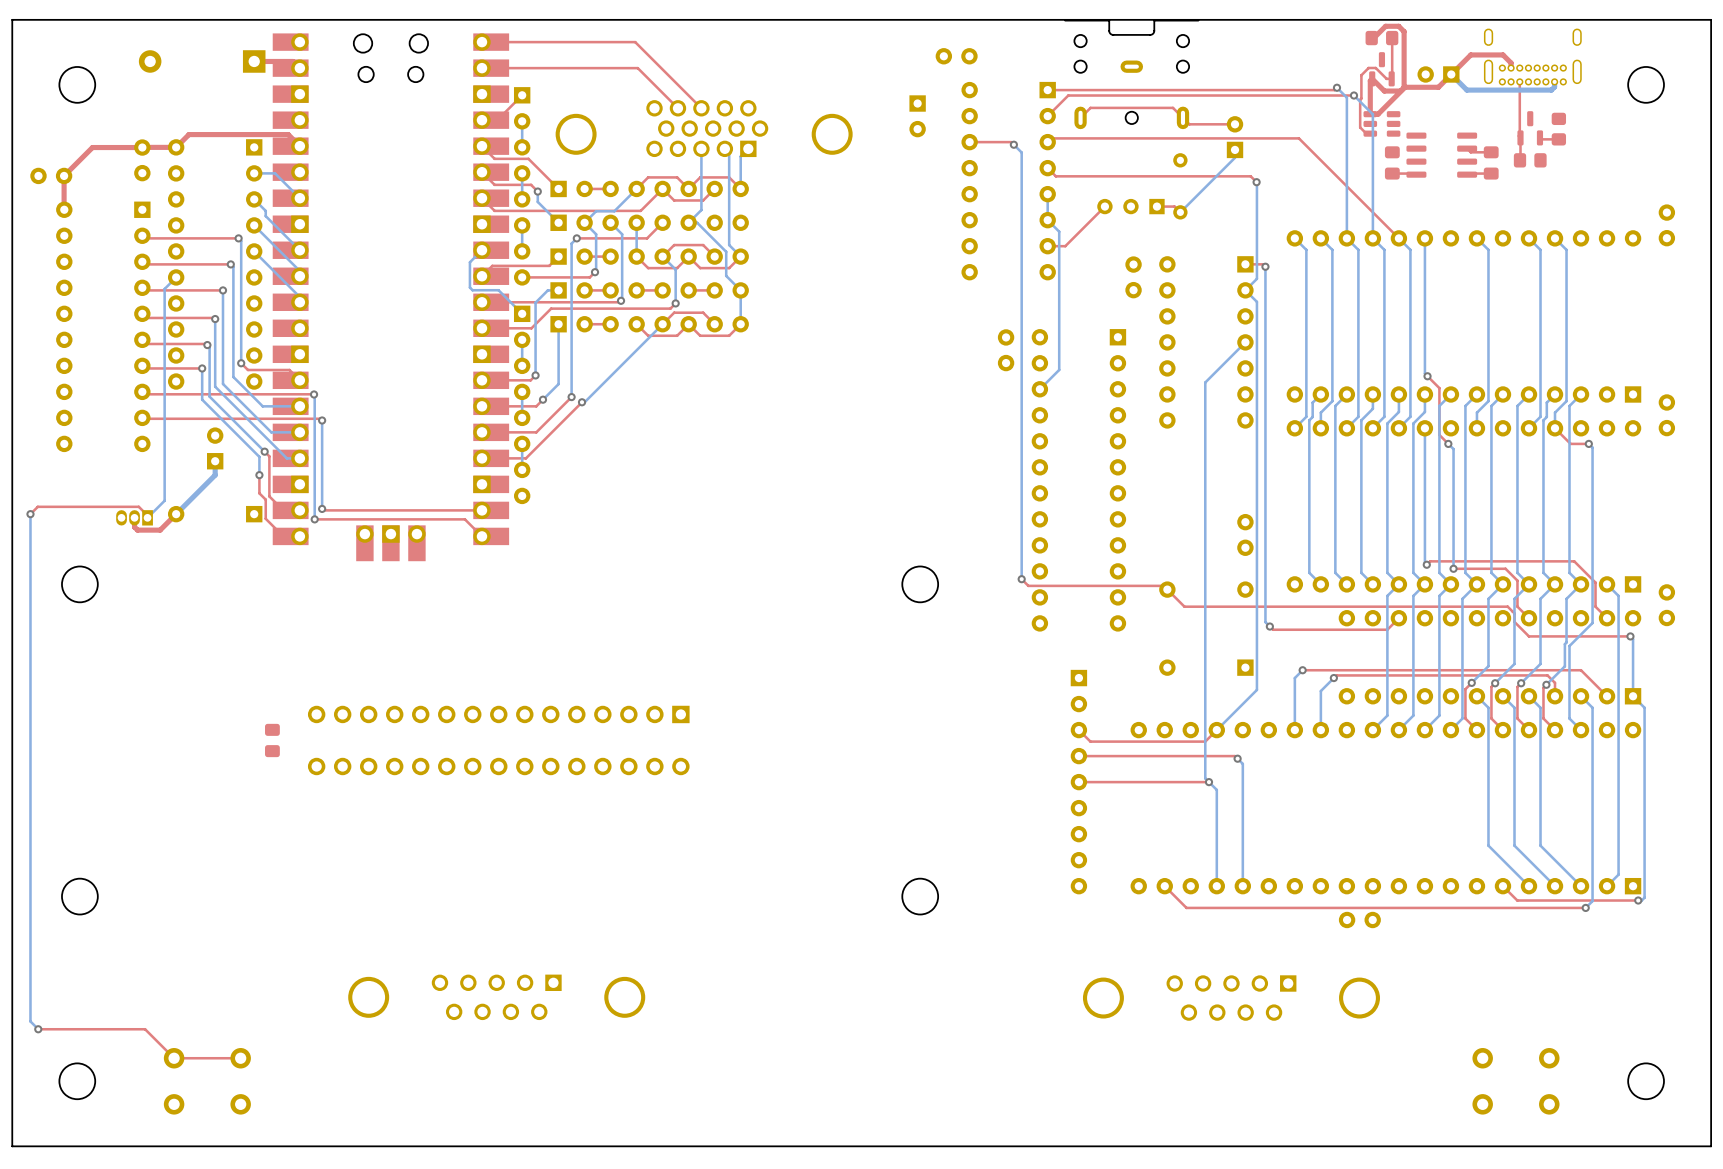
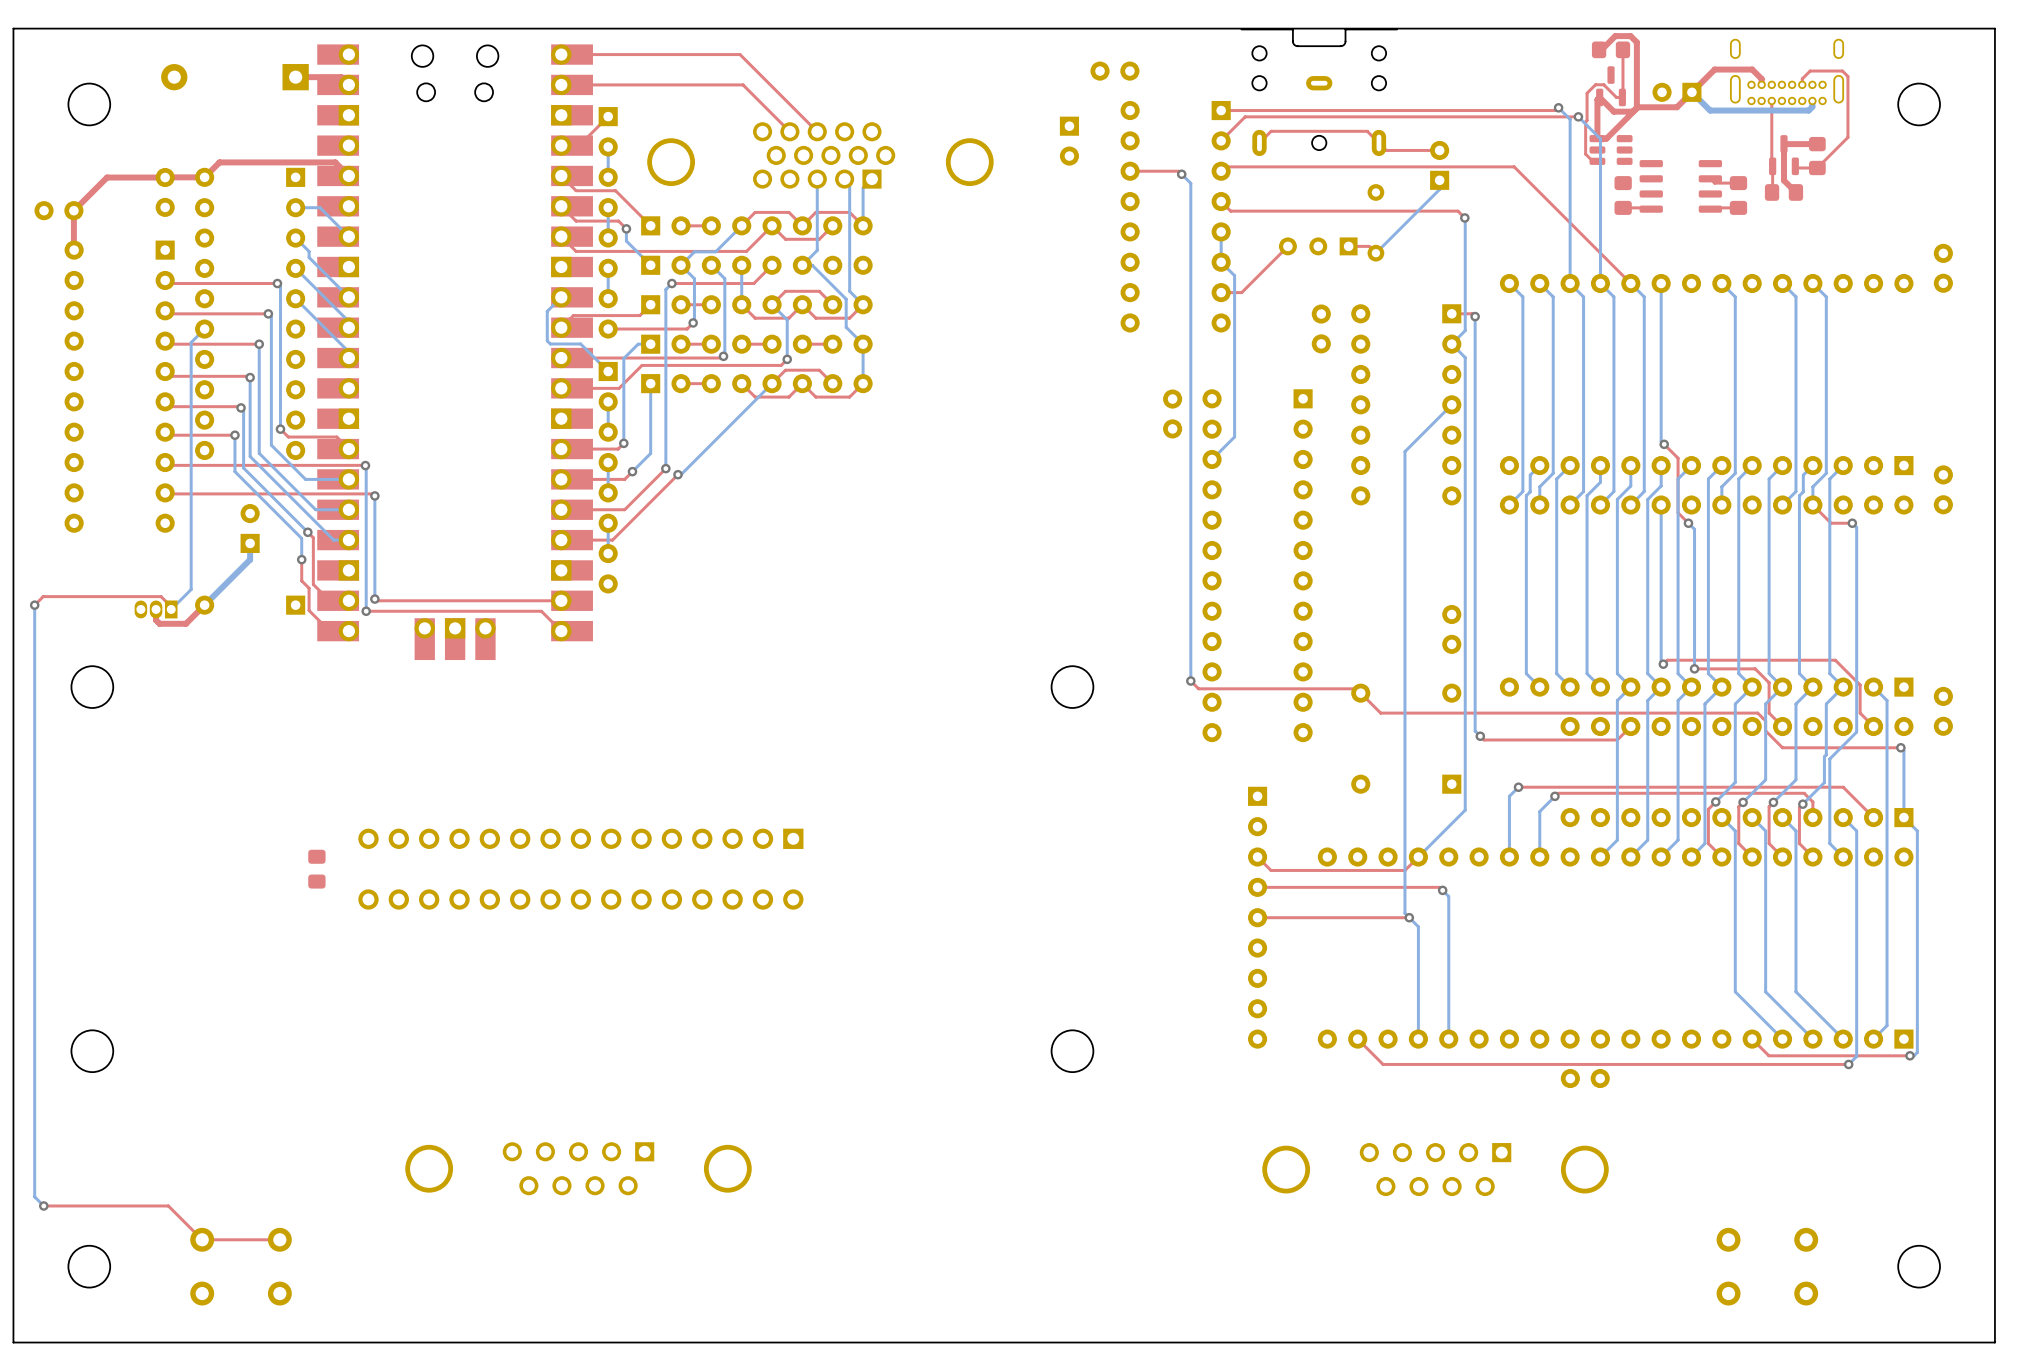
top track: none -> (1802, 84) (1802, 78) (1810, 71) (1842, 71) (1847, 76) (1847, 137) (1817, 168)
top track: none -> (1817, 144) (1783, 143) (1783, 180) (1795, 192)

